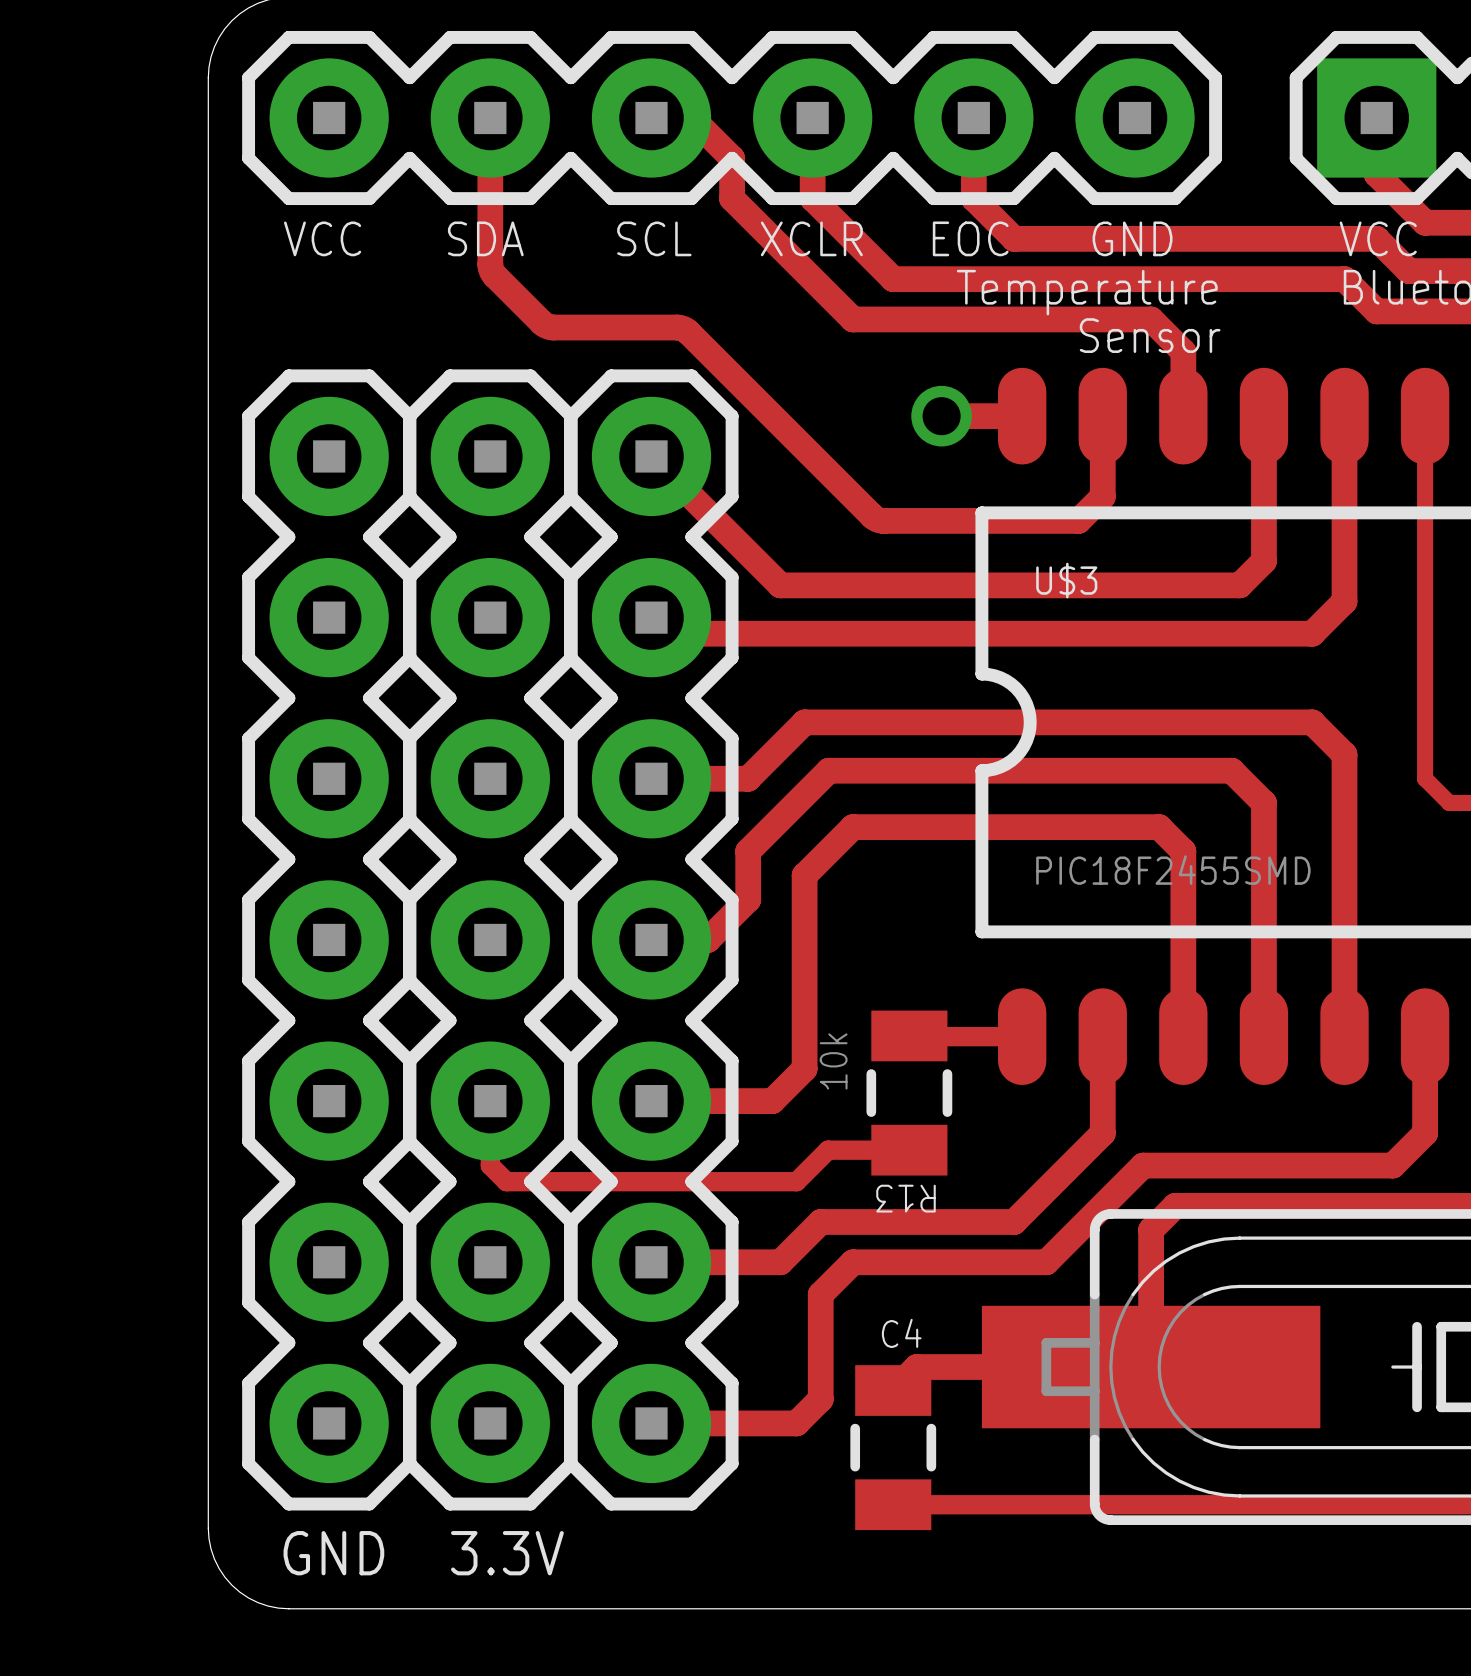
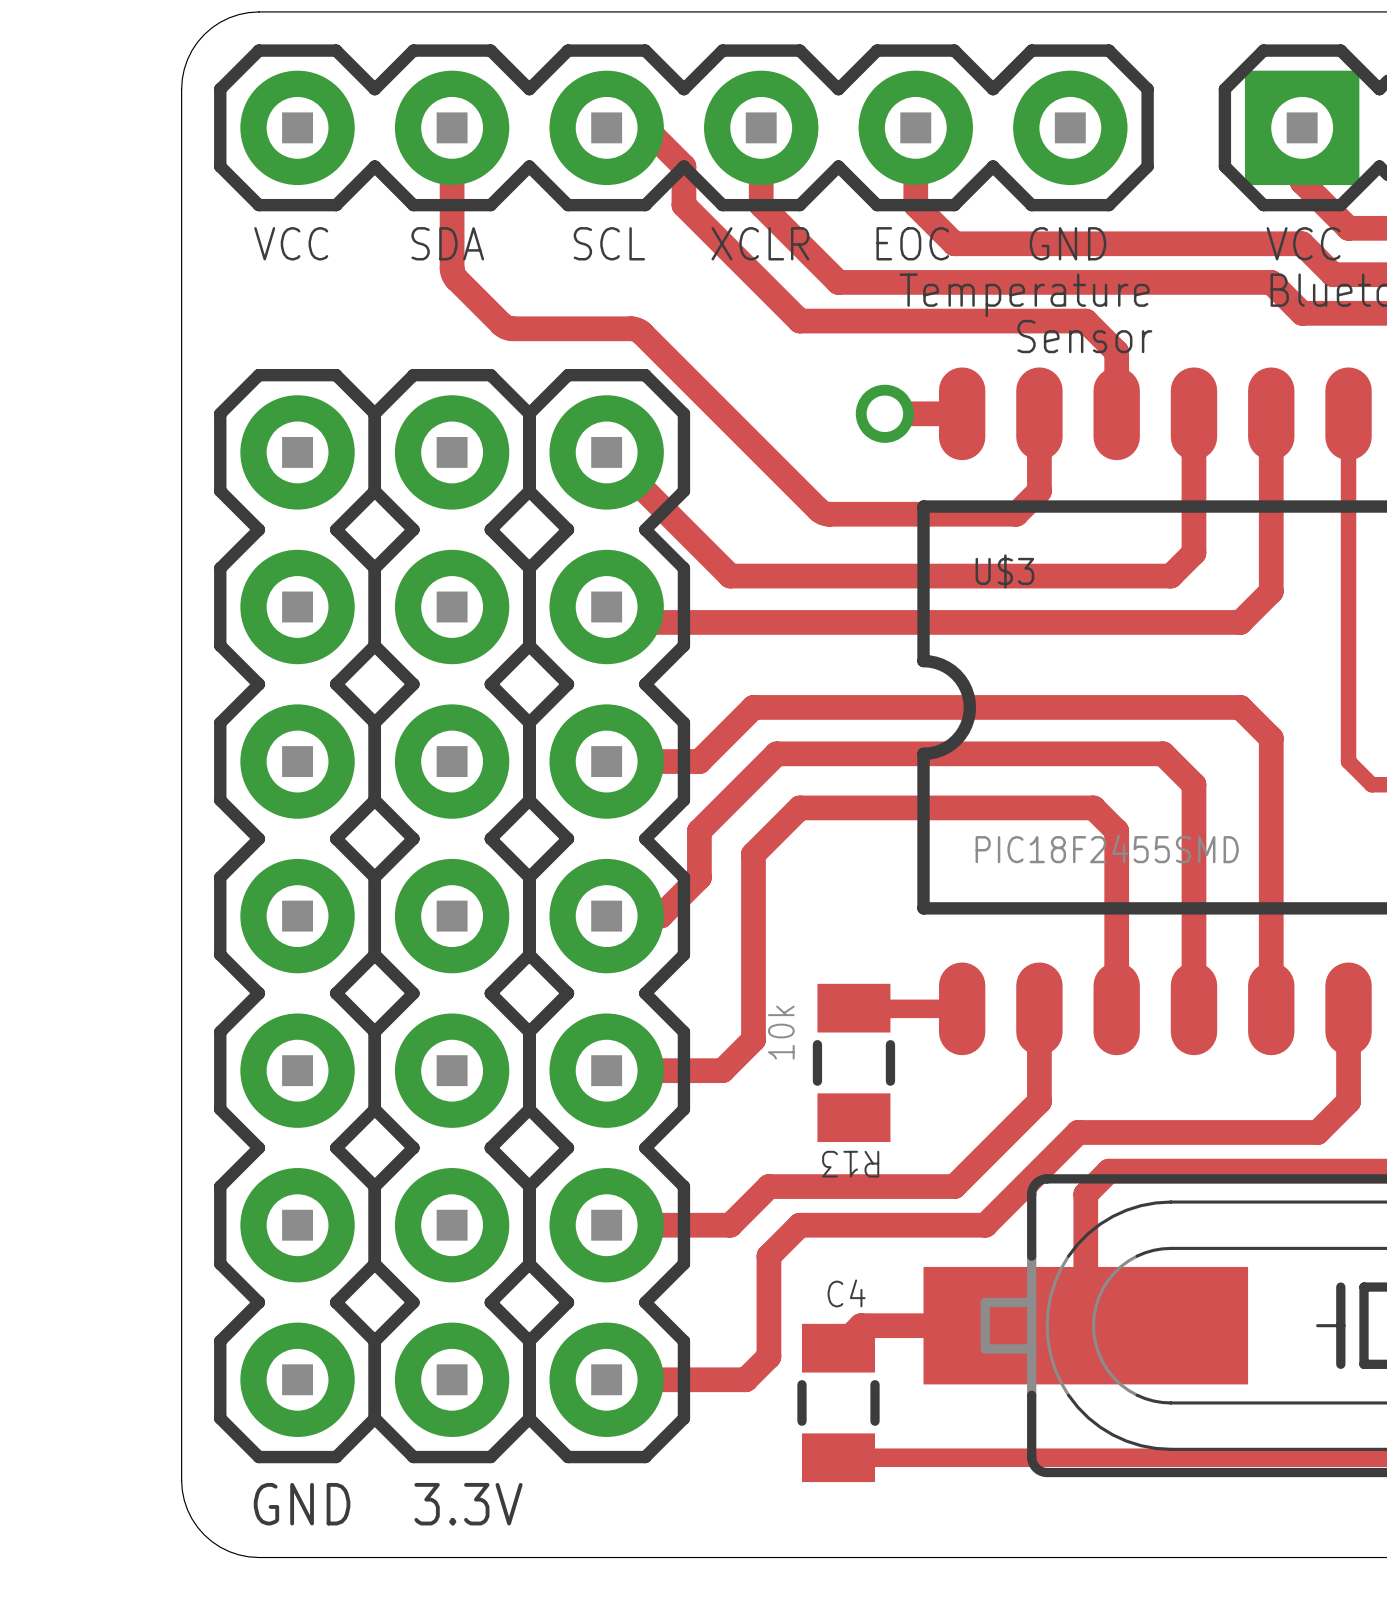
track: (490, 1101) (490, 1165) (506, 1181) (796, 1181) (828, 1150) (909, 1150) -> none

